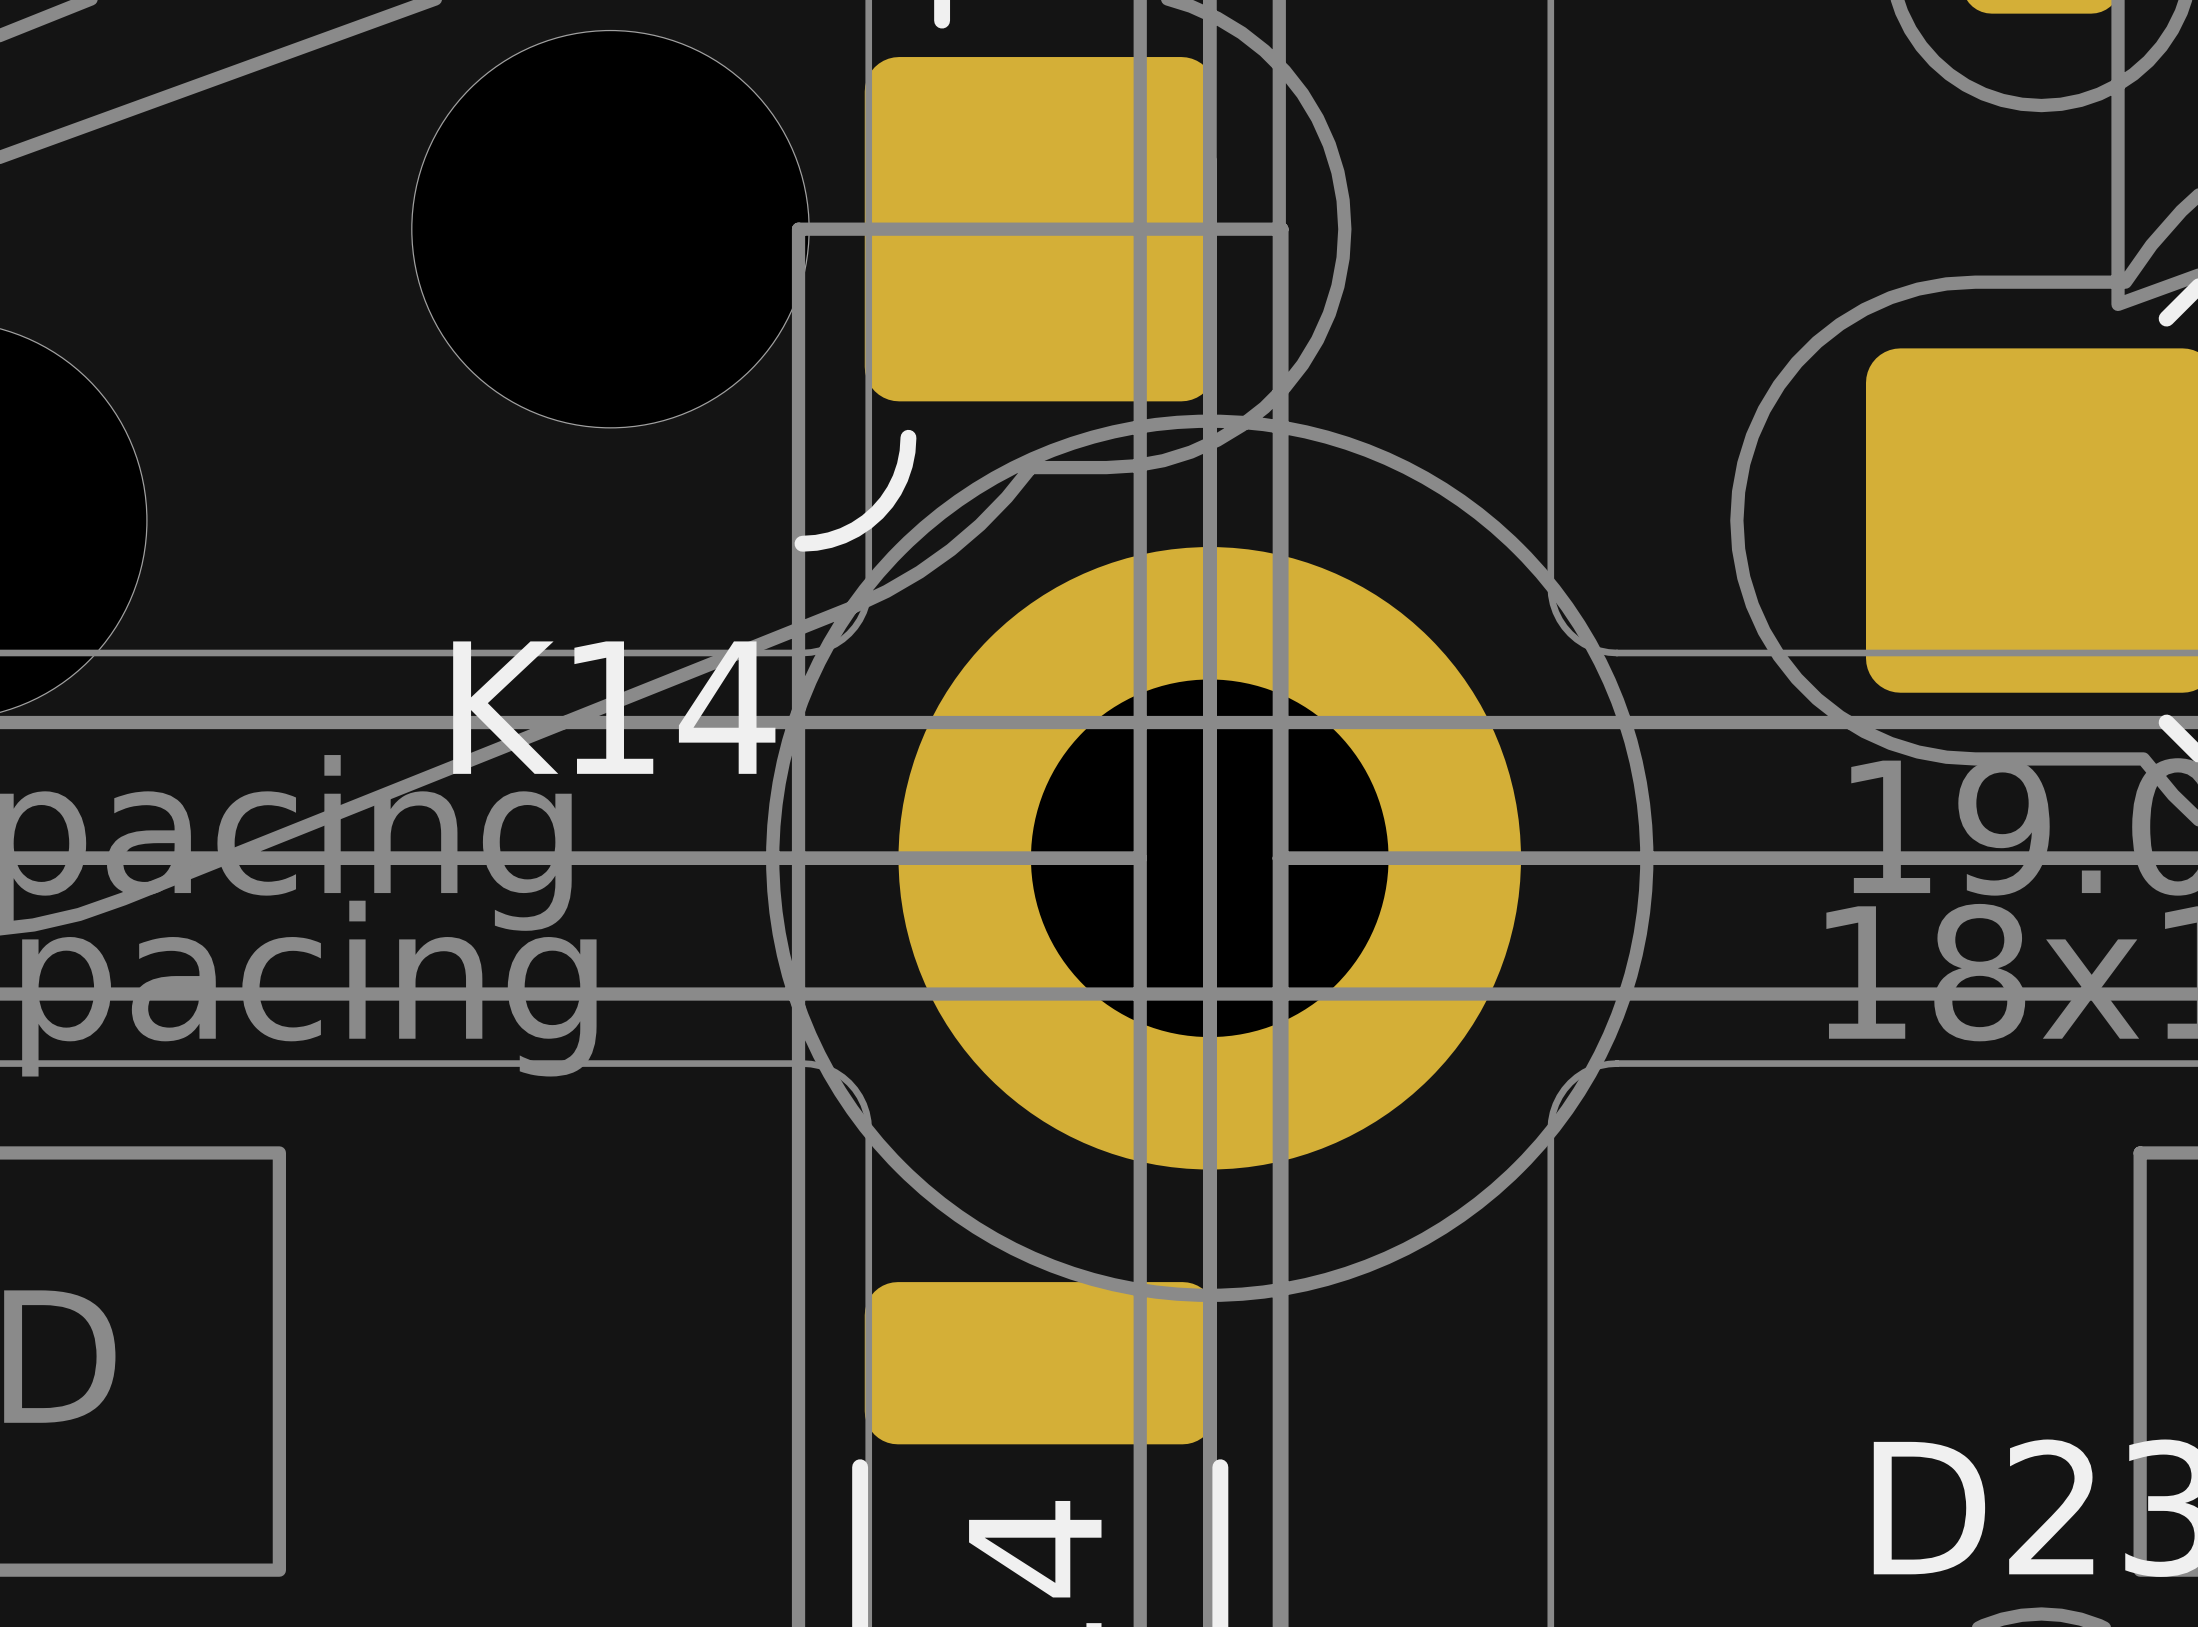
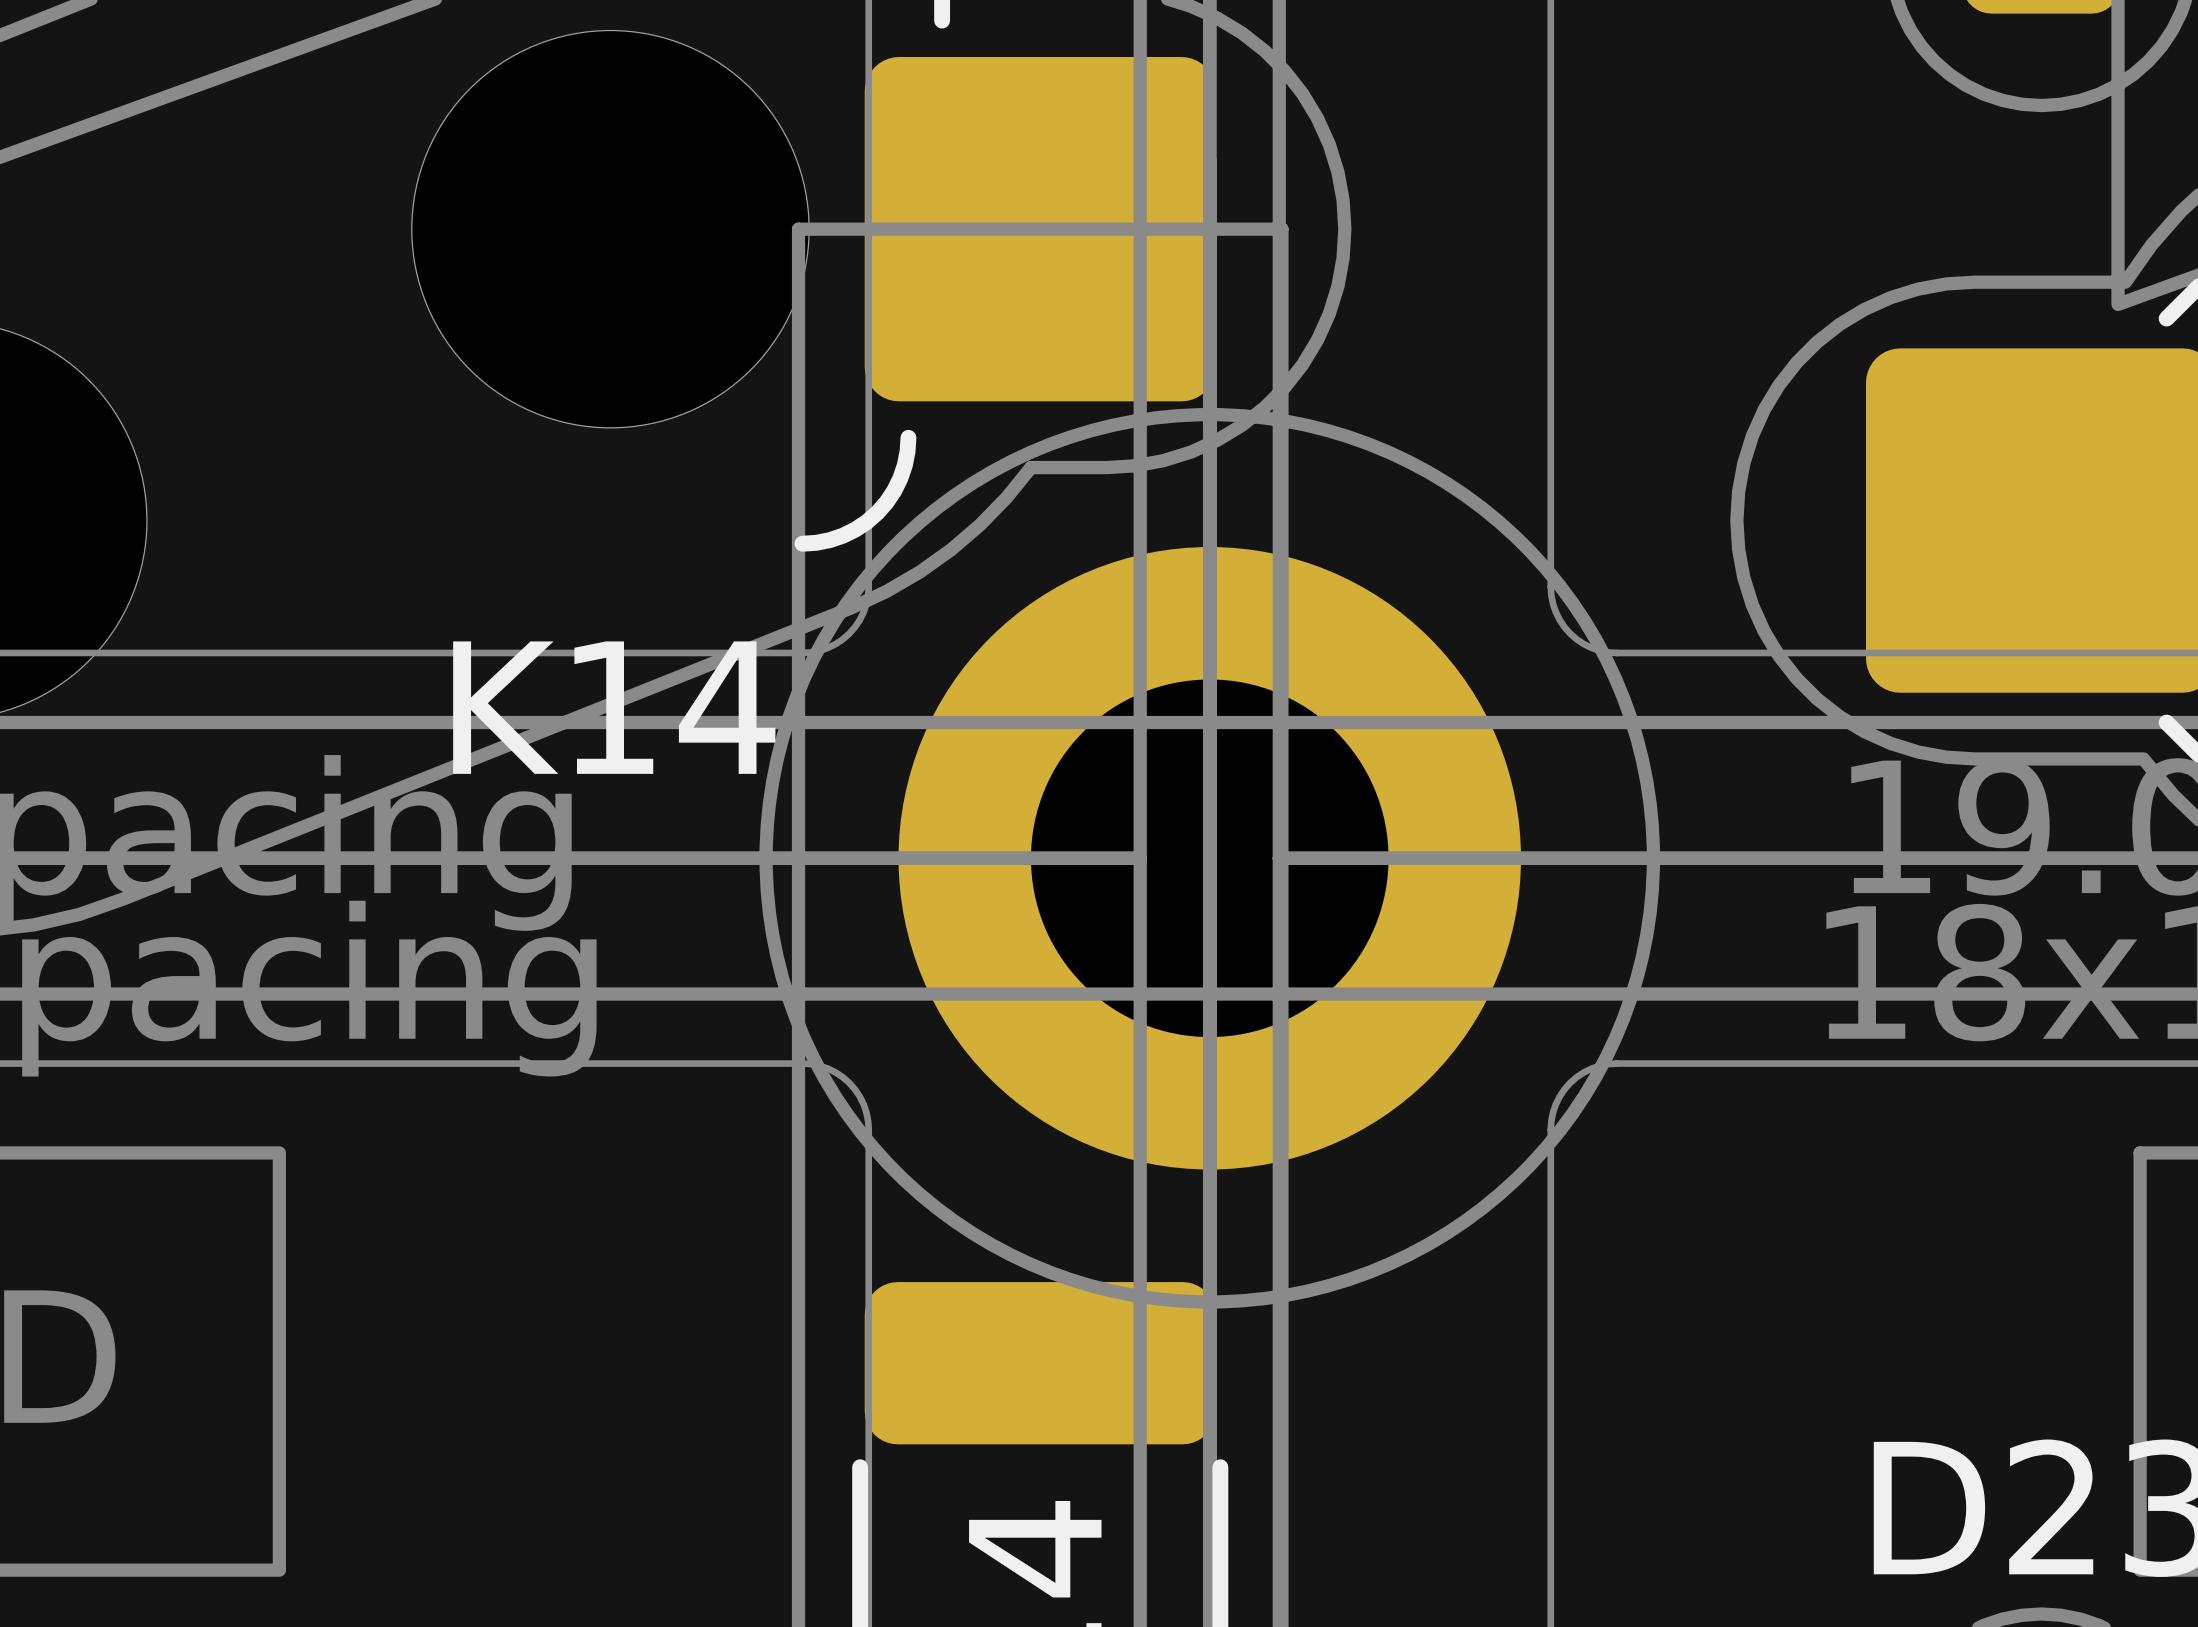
part footprint: [766, 414, 1654, 1302] -> [759, 407, 1661, 1309]

